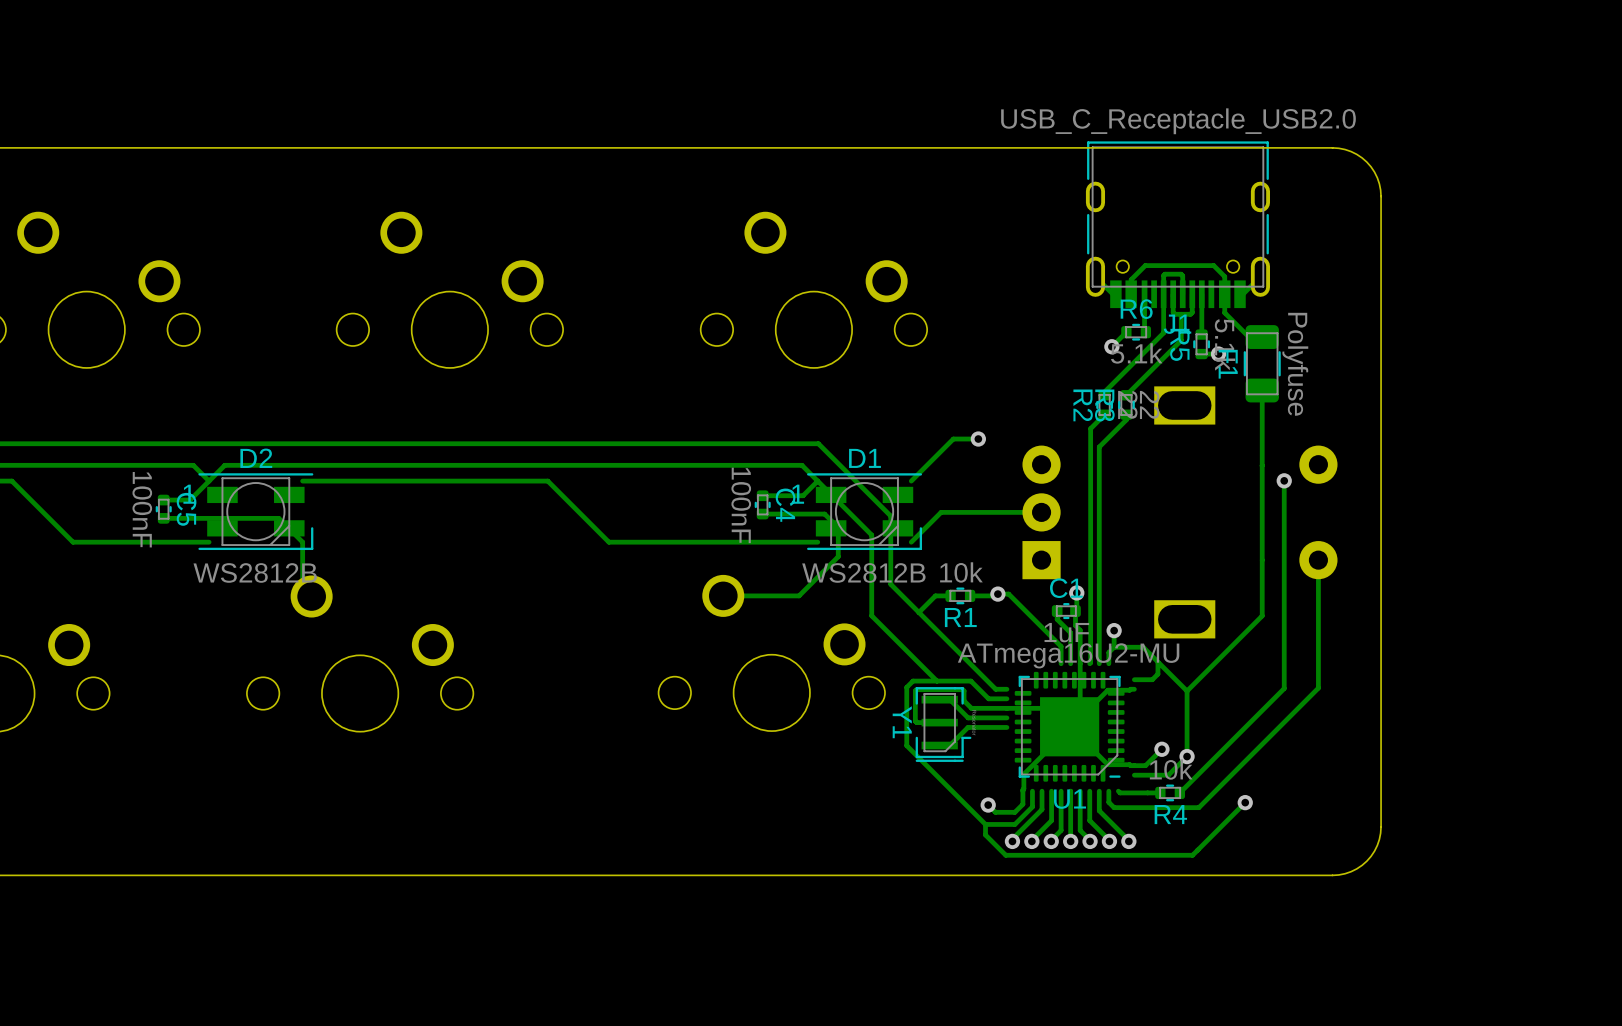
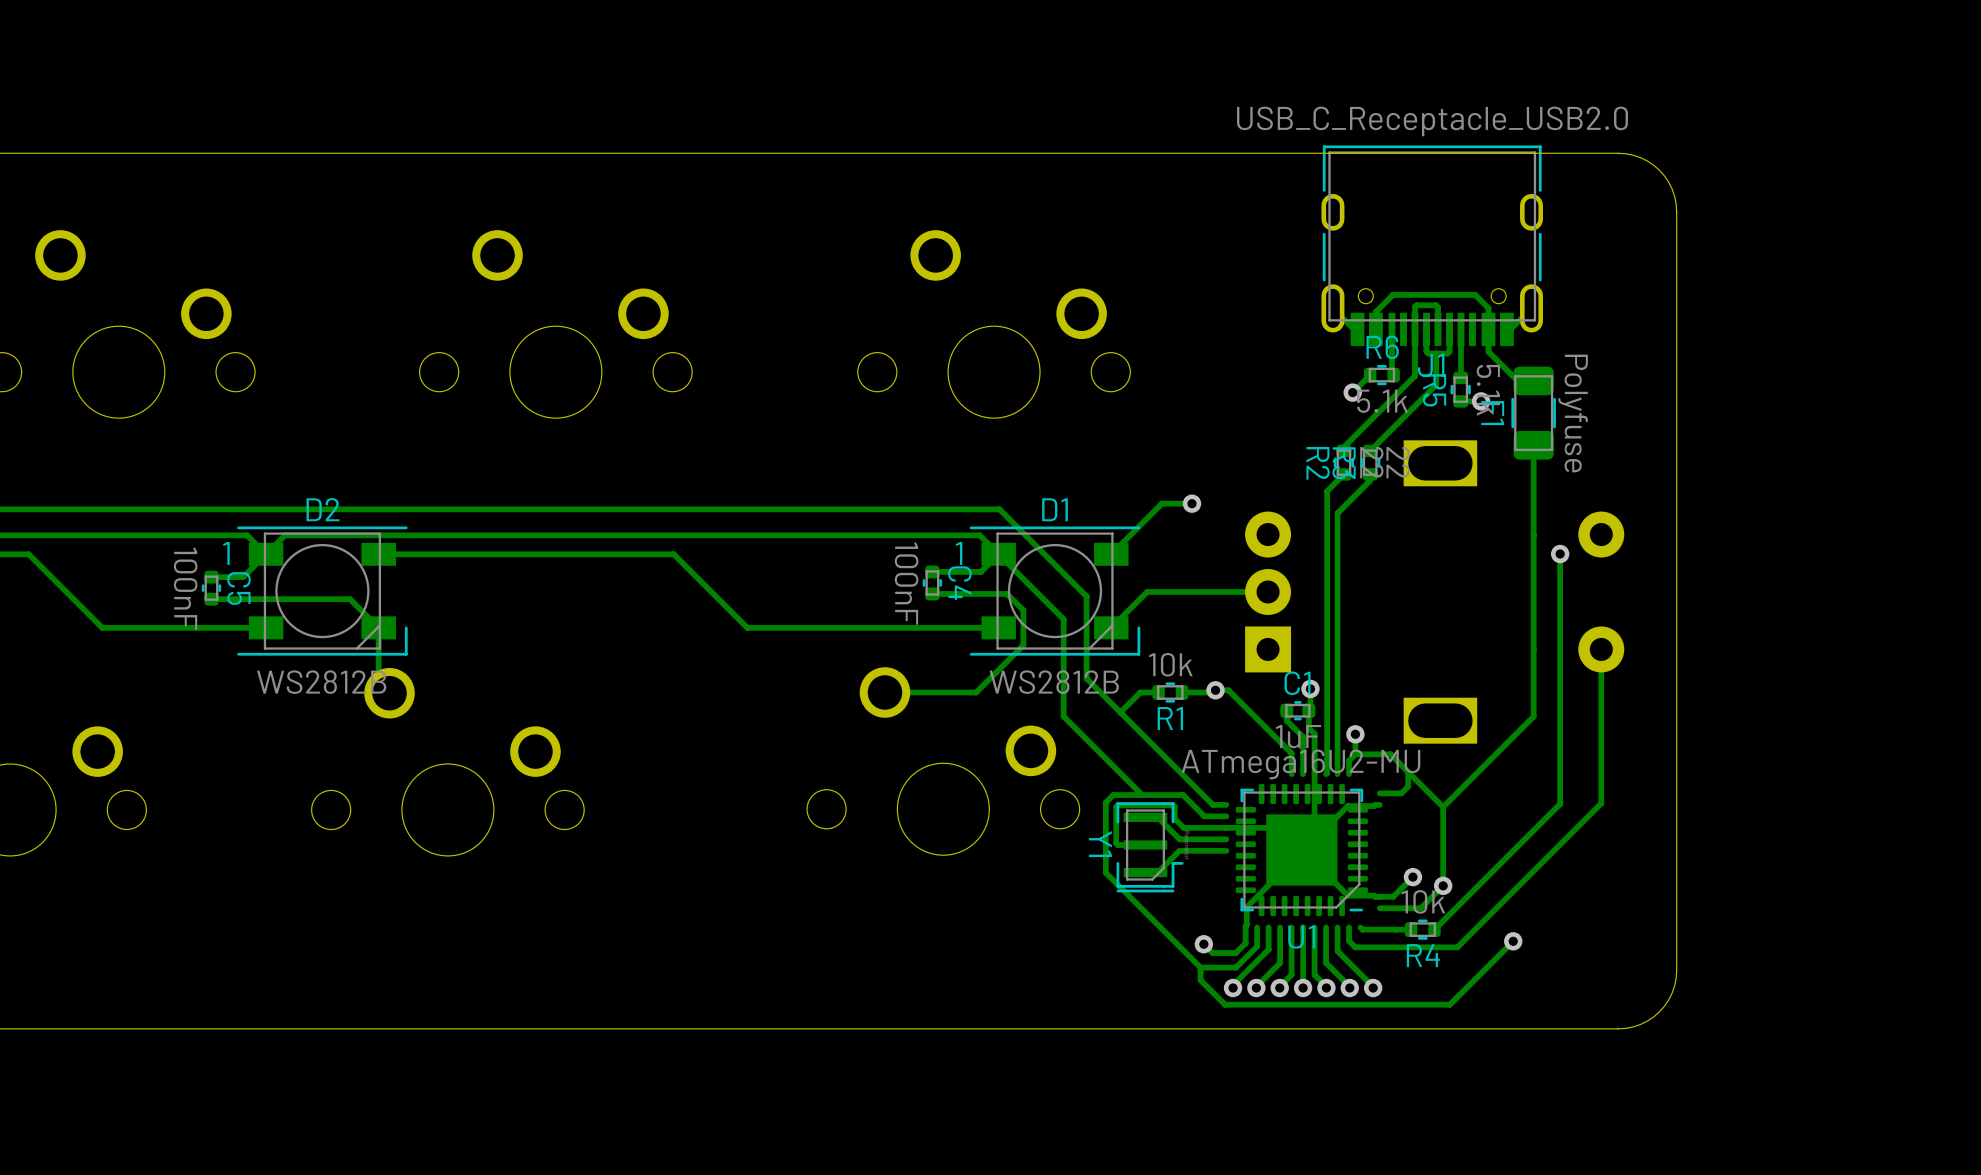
D2 footprint: [198, 473, 314, 551] -> [237, 526, 408, 656]
D1 footprint: [807, 473, 923, 551] -> [969, 526, 1141, 656]

